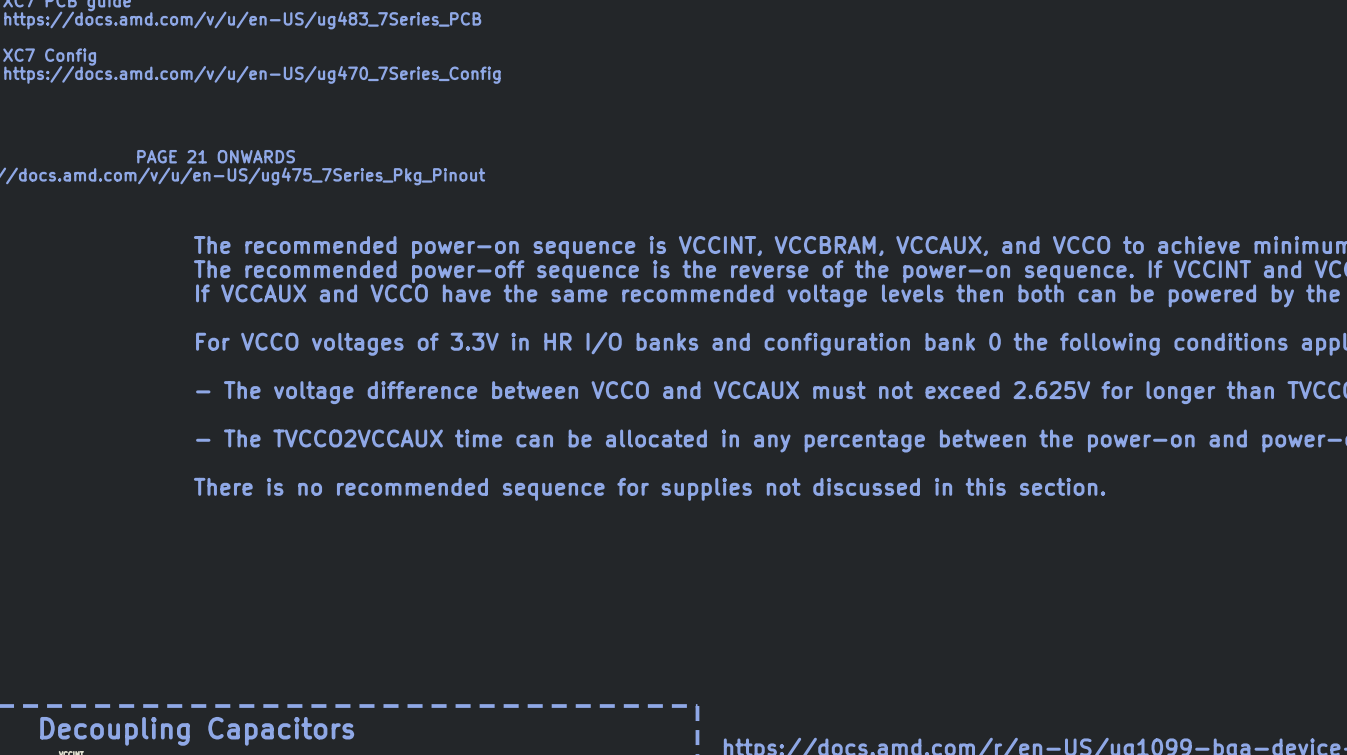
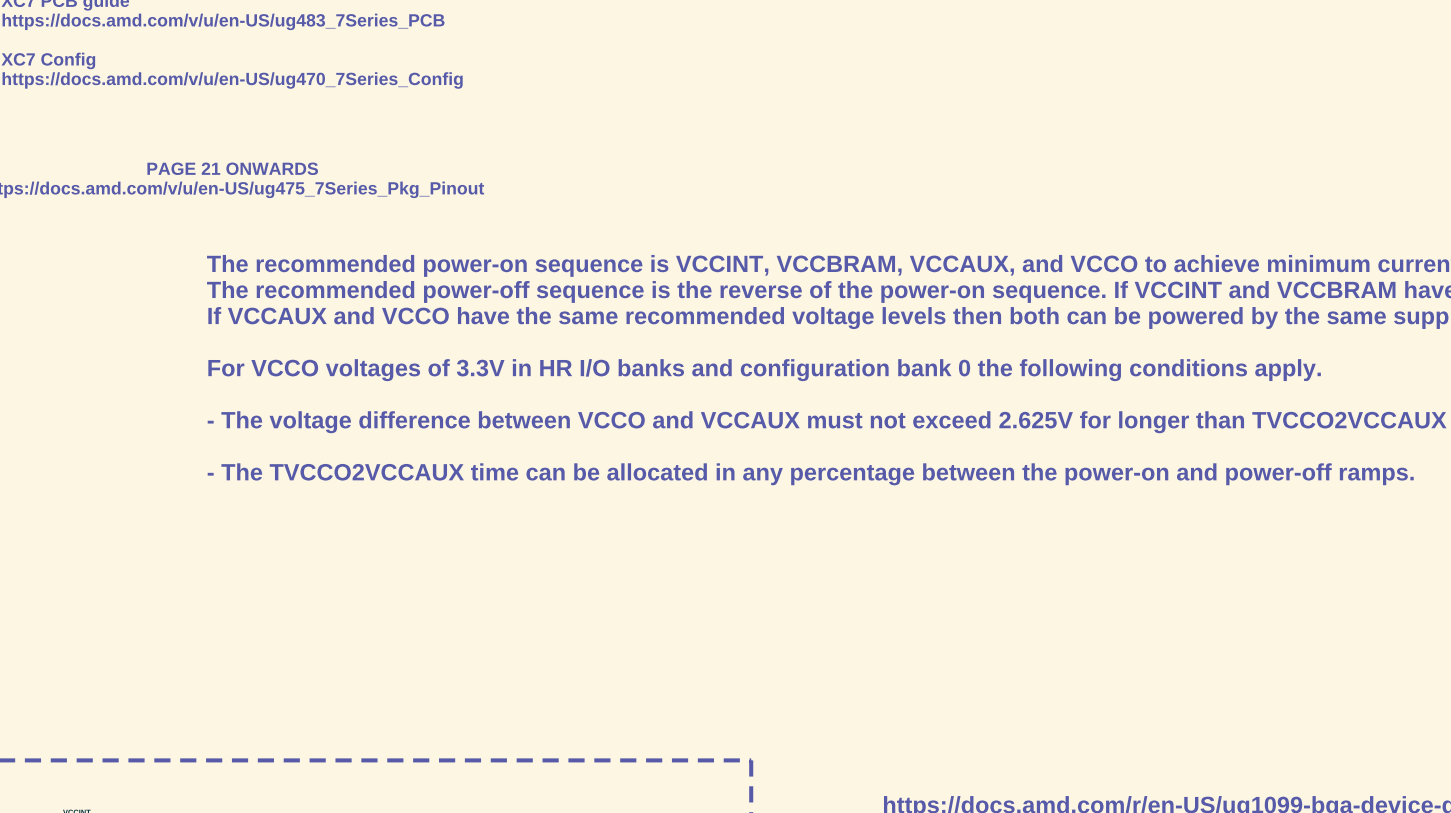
text: There is no recommended sequence for supplies not discussed in this section. (649, 489) -> none
text: Decoupling Capacitors (197, 731) -> none

